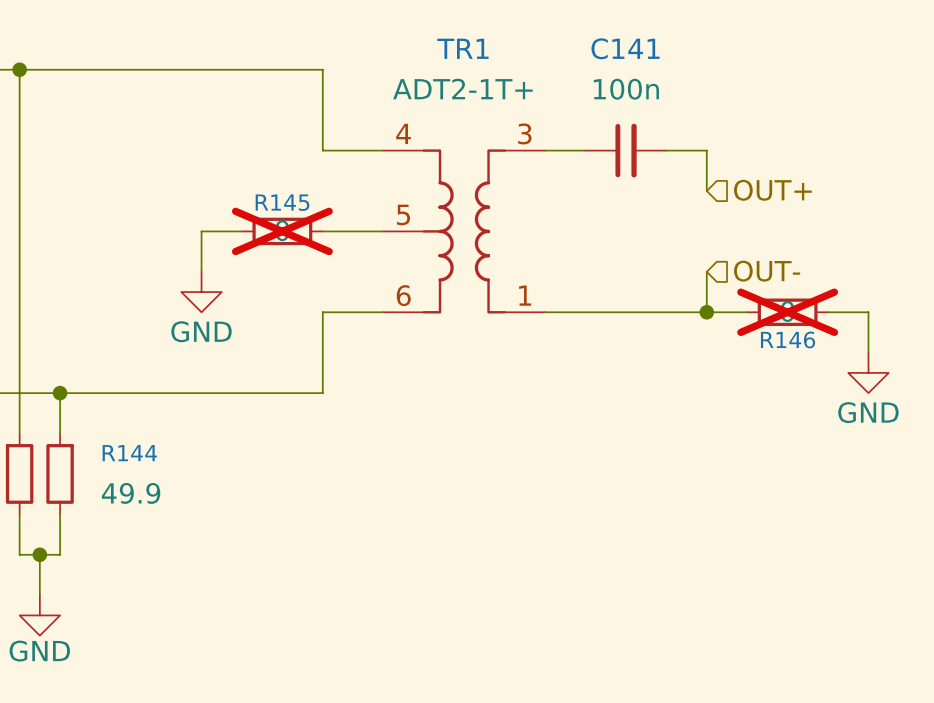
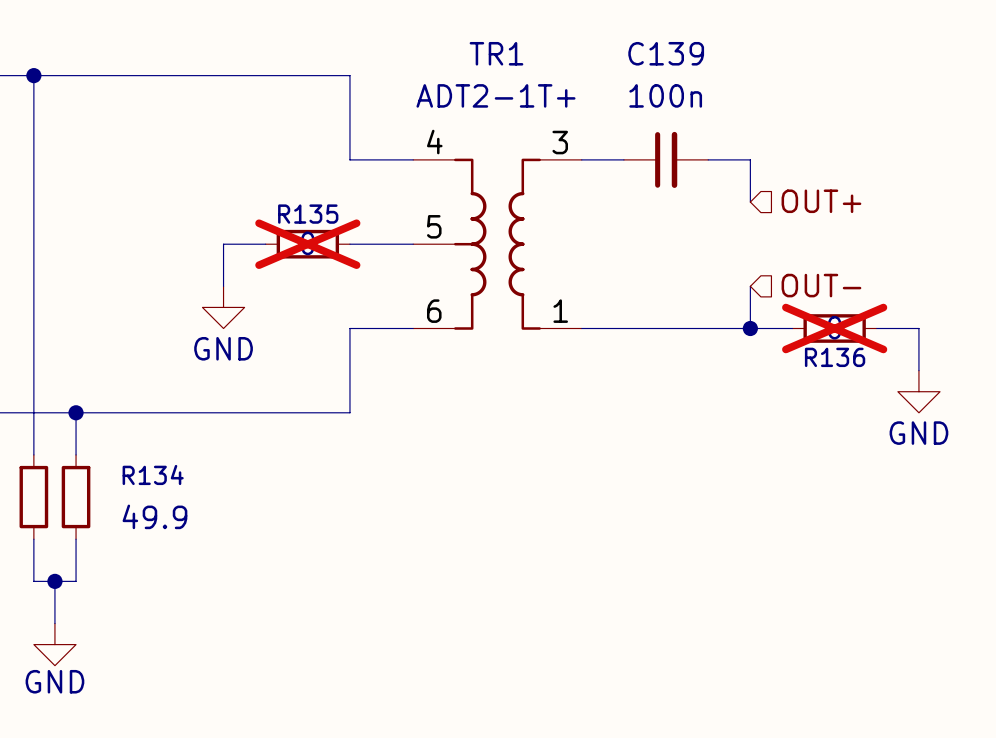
C141 name: C141 (625, 48) -> C139 (666, 53)
R145 name: R145 (282, 202) -> R135 (308, 214)
R146 name: R146 (788, 339) -> R136 (835, 357)
R144 name: R144 (129, 453) -> R134 (153, 474)

